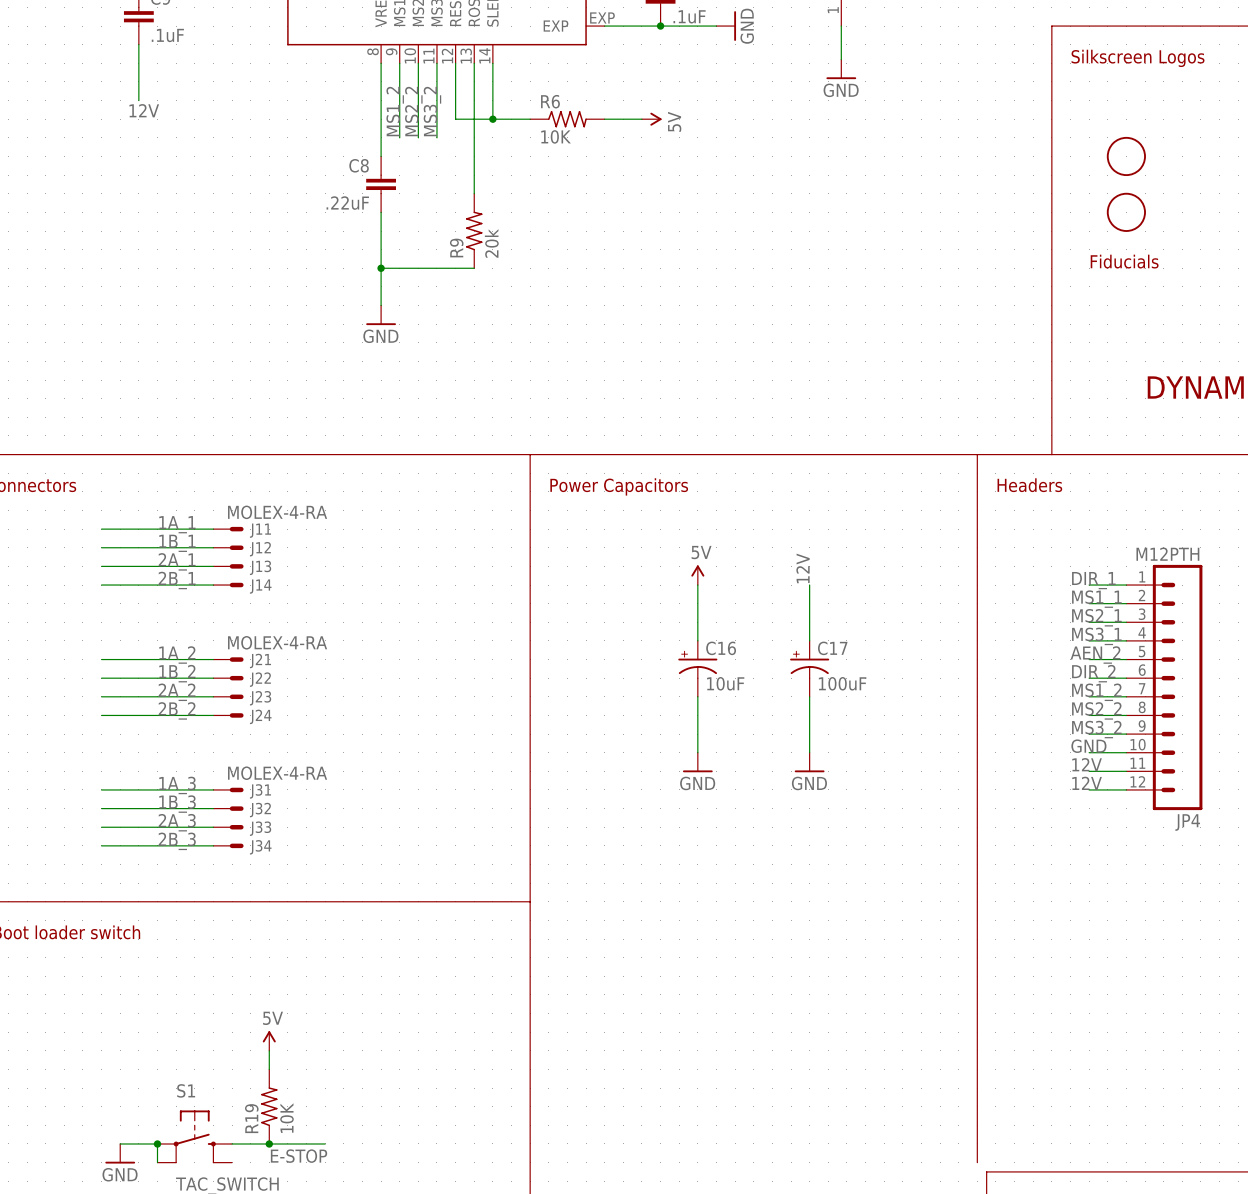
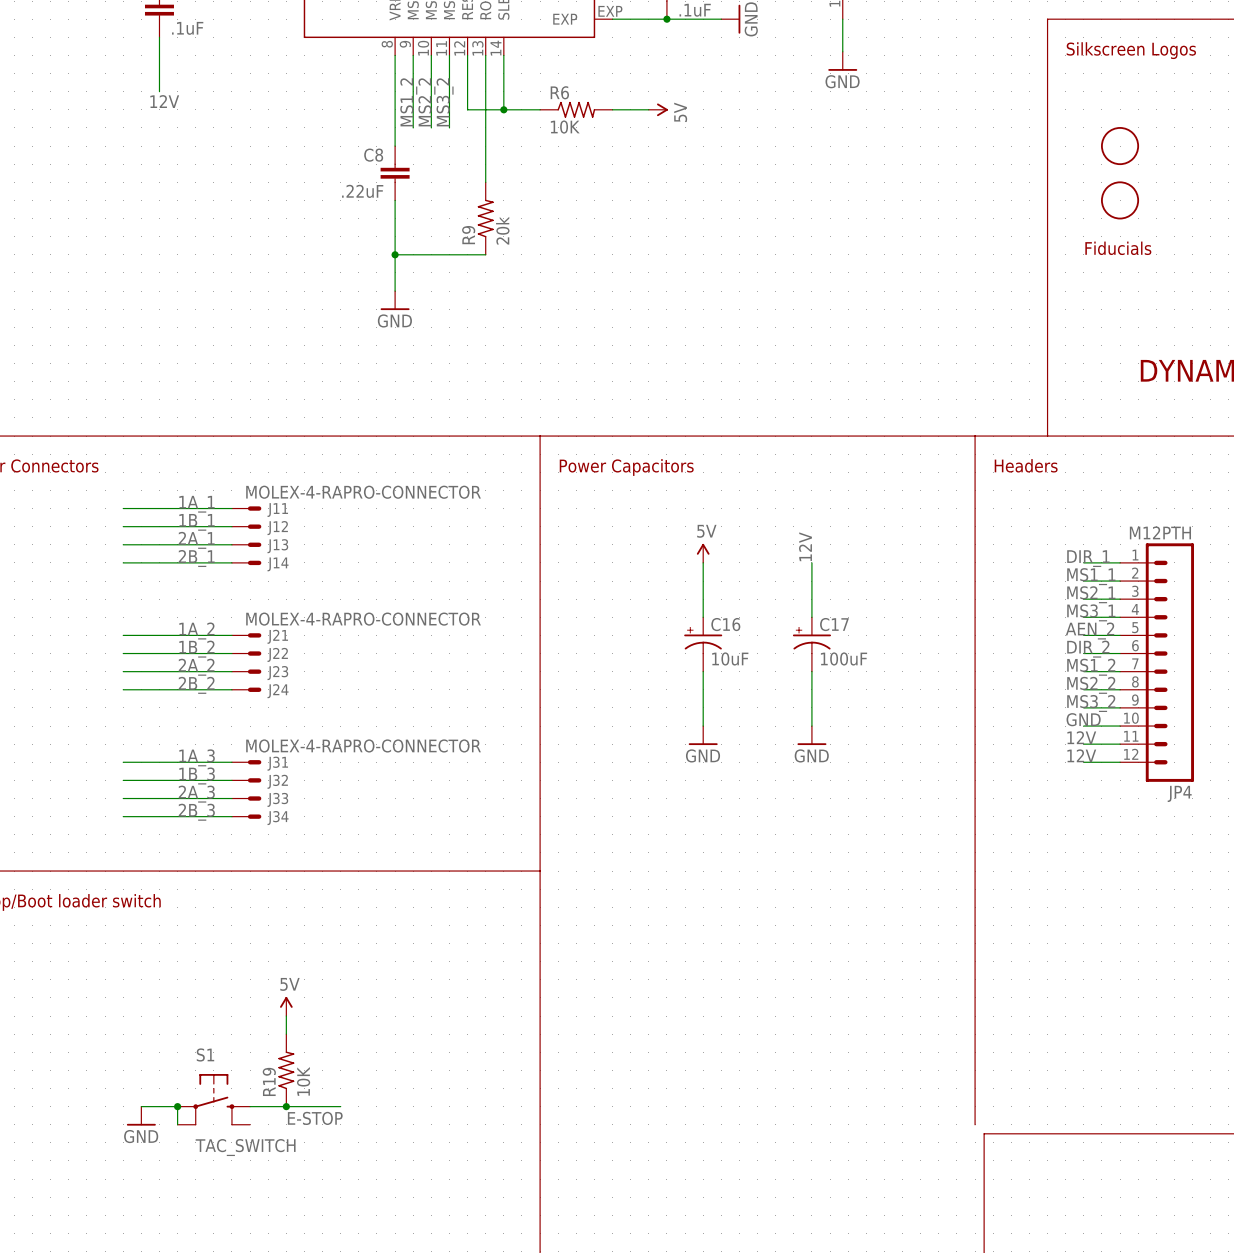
J11 value: MOLEX-4-RA (277, 512) -> MOLEX-4-RAPRO-CONNECTOR (363, 492)
J21 value: MOLEX-4-RA (277, 642) -> MOLEX-4-RAPRO-CONNECTOR (363, 619)
J31 value: MOLEX-4-RA (277, 773) -> MOLEX-4-RAPRO-CONNECTOR (363, 745)

